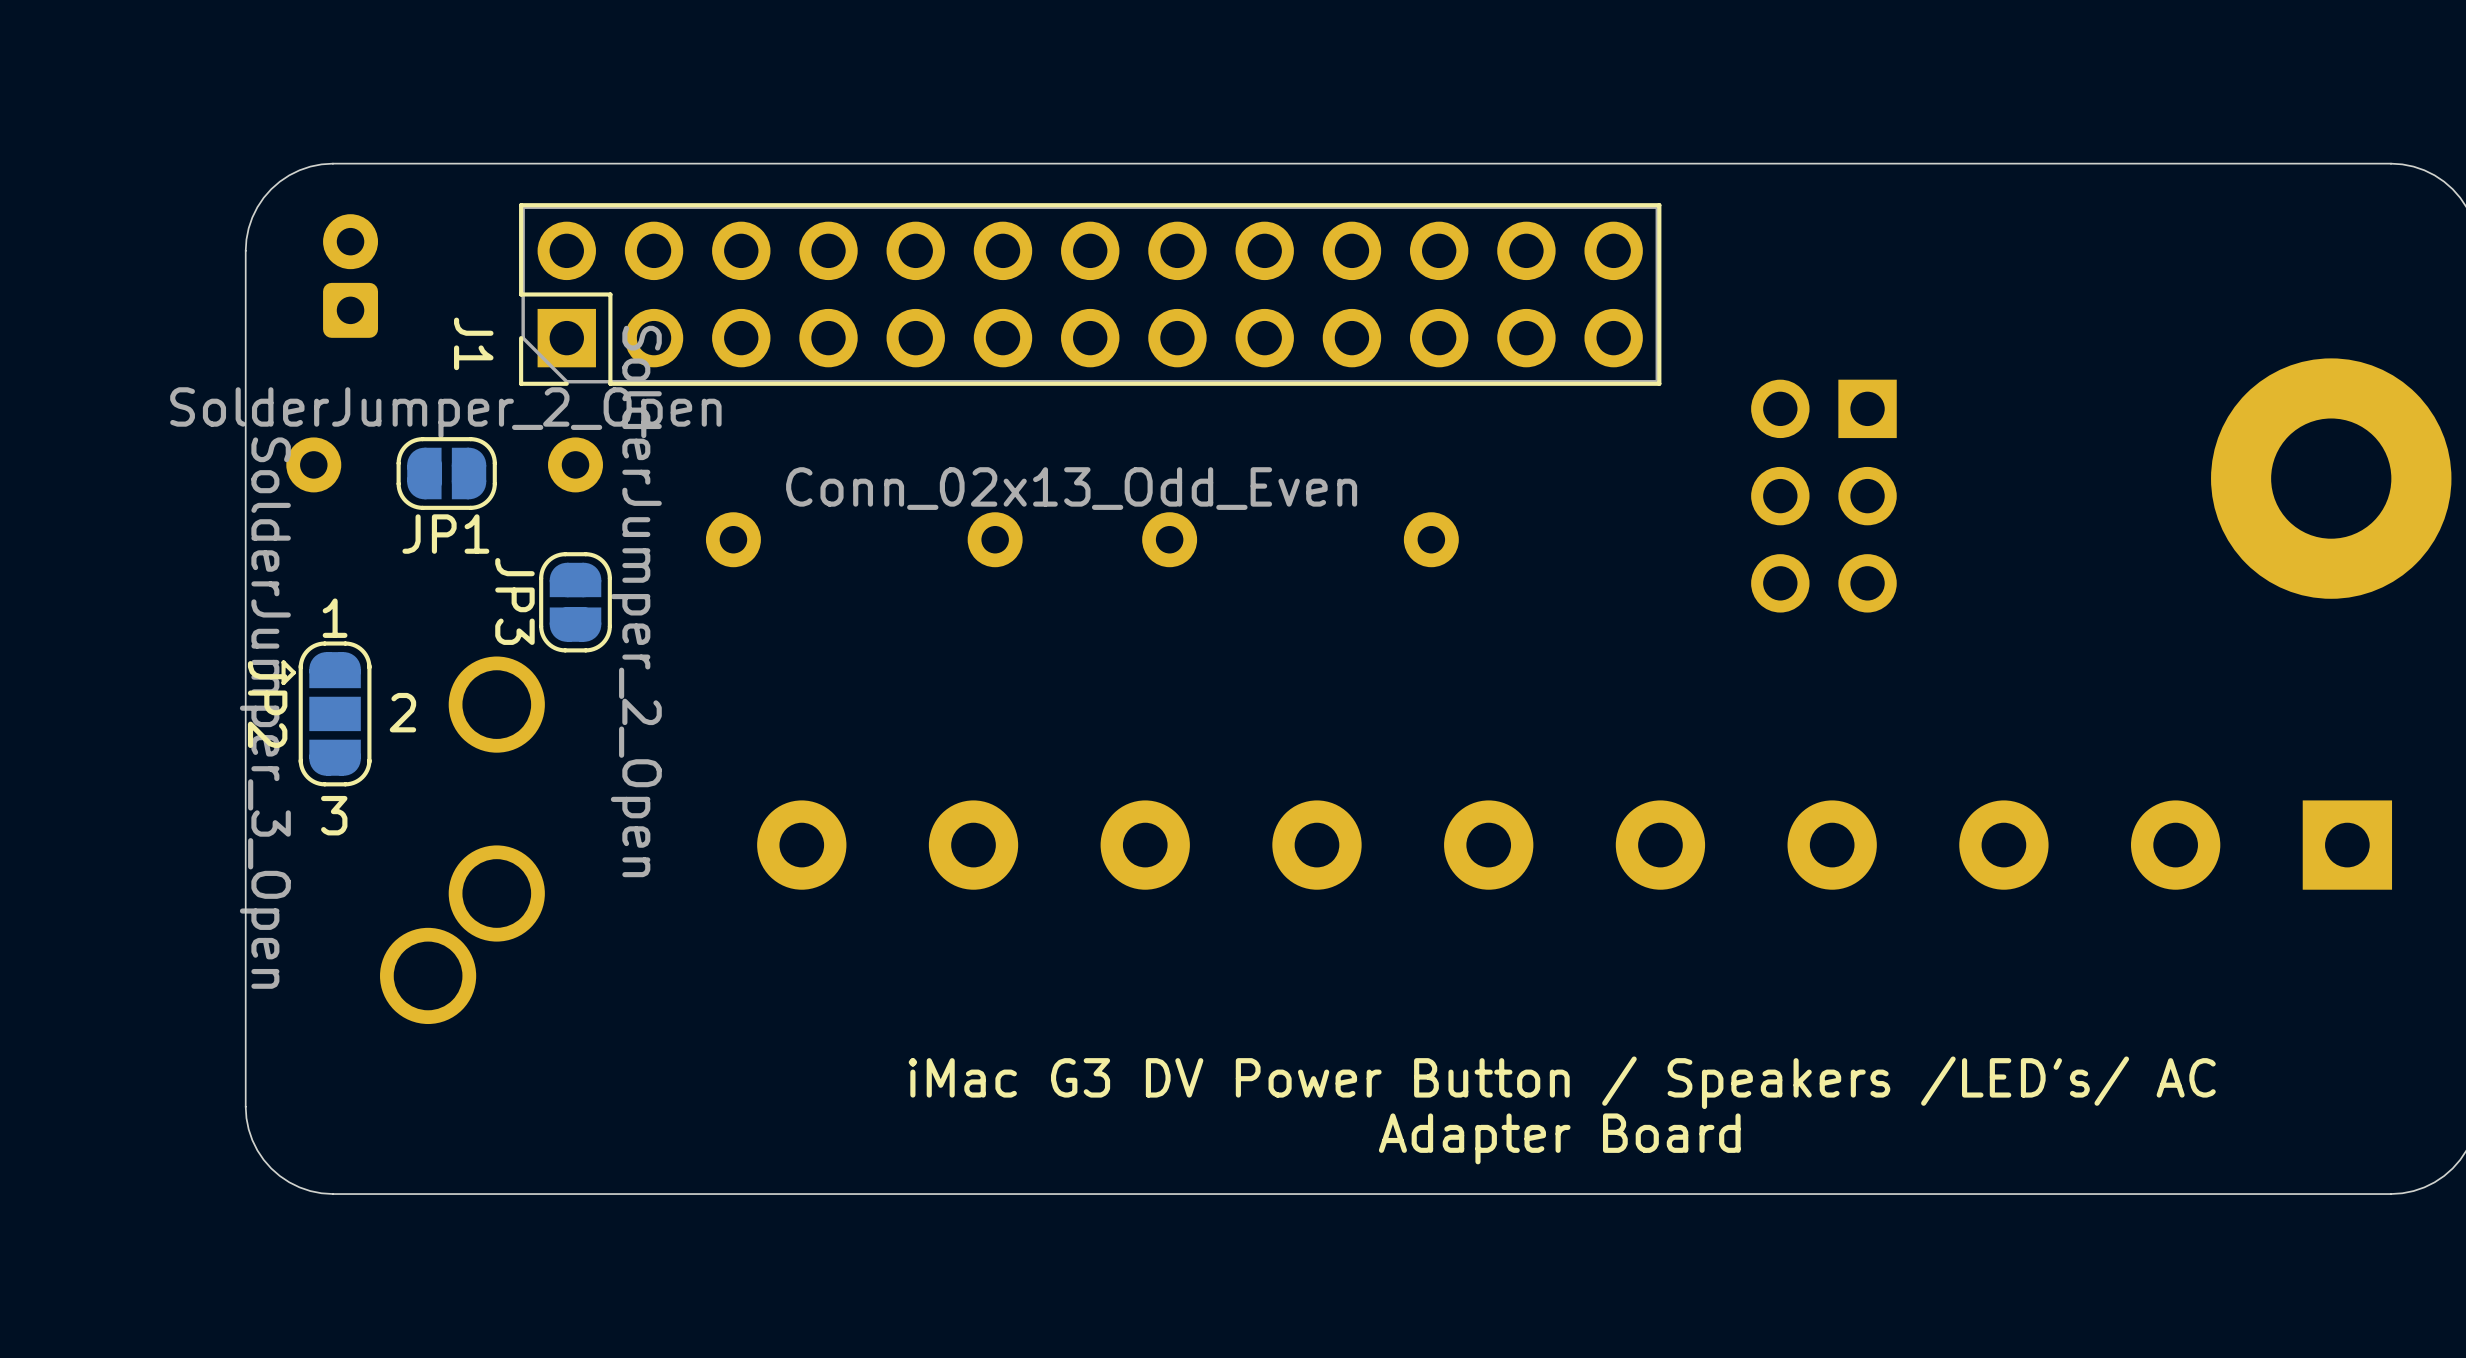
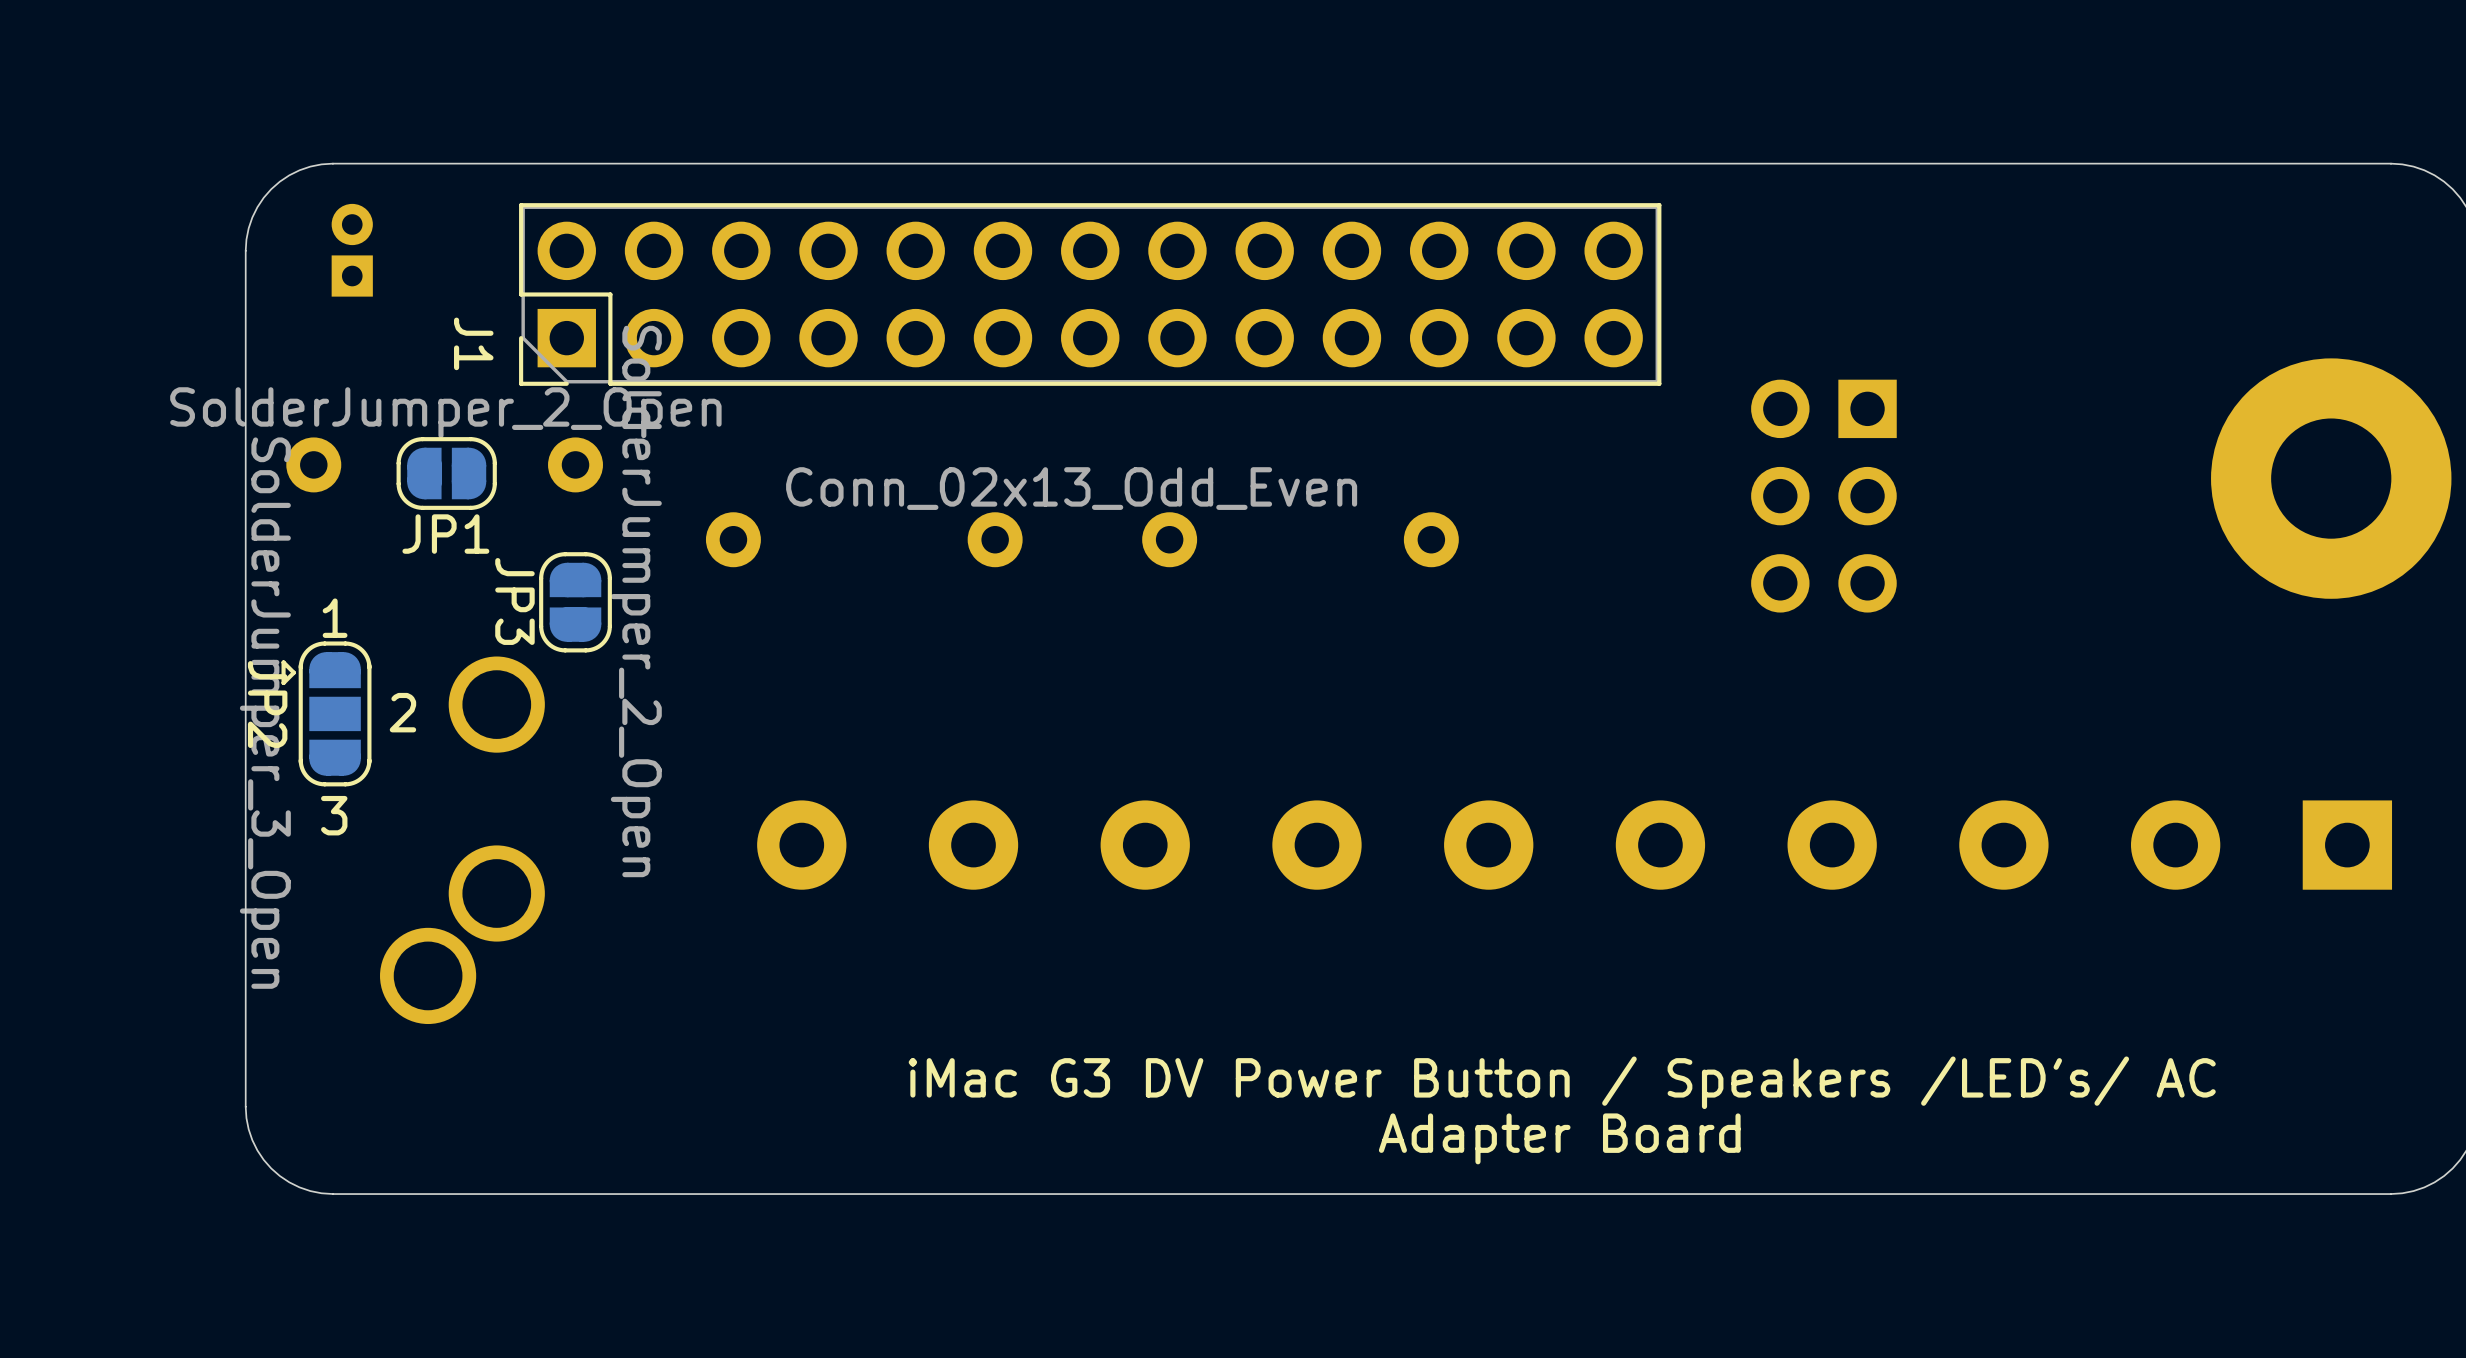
part footprint: [323, 214, 379, 338] -> [331, 203, 373, 297]

